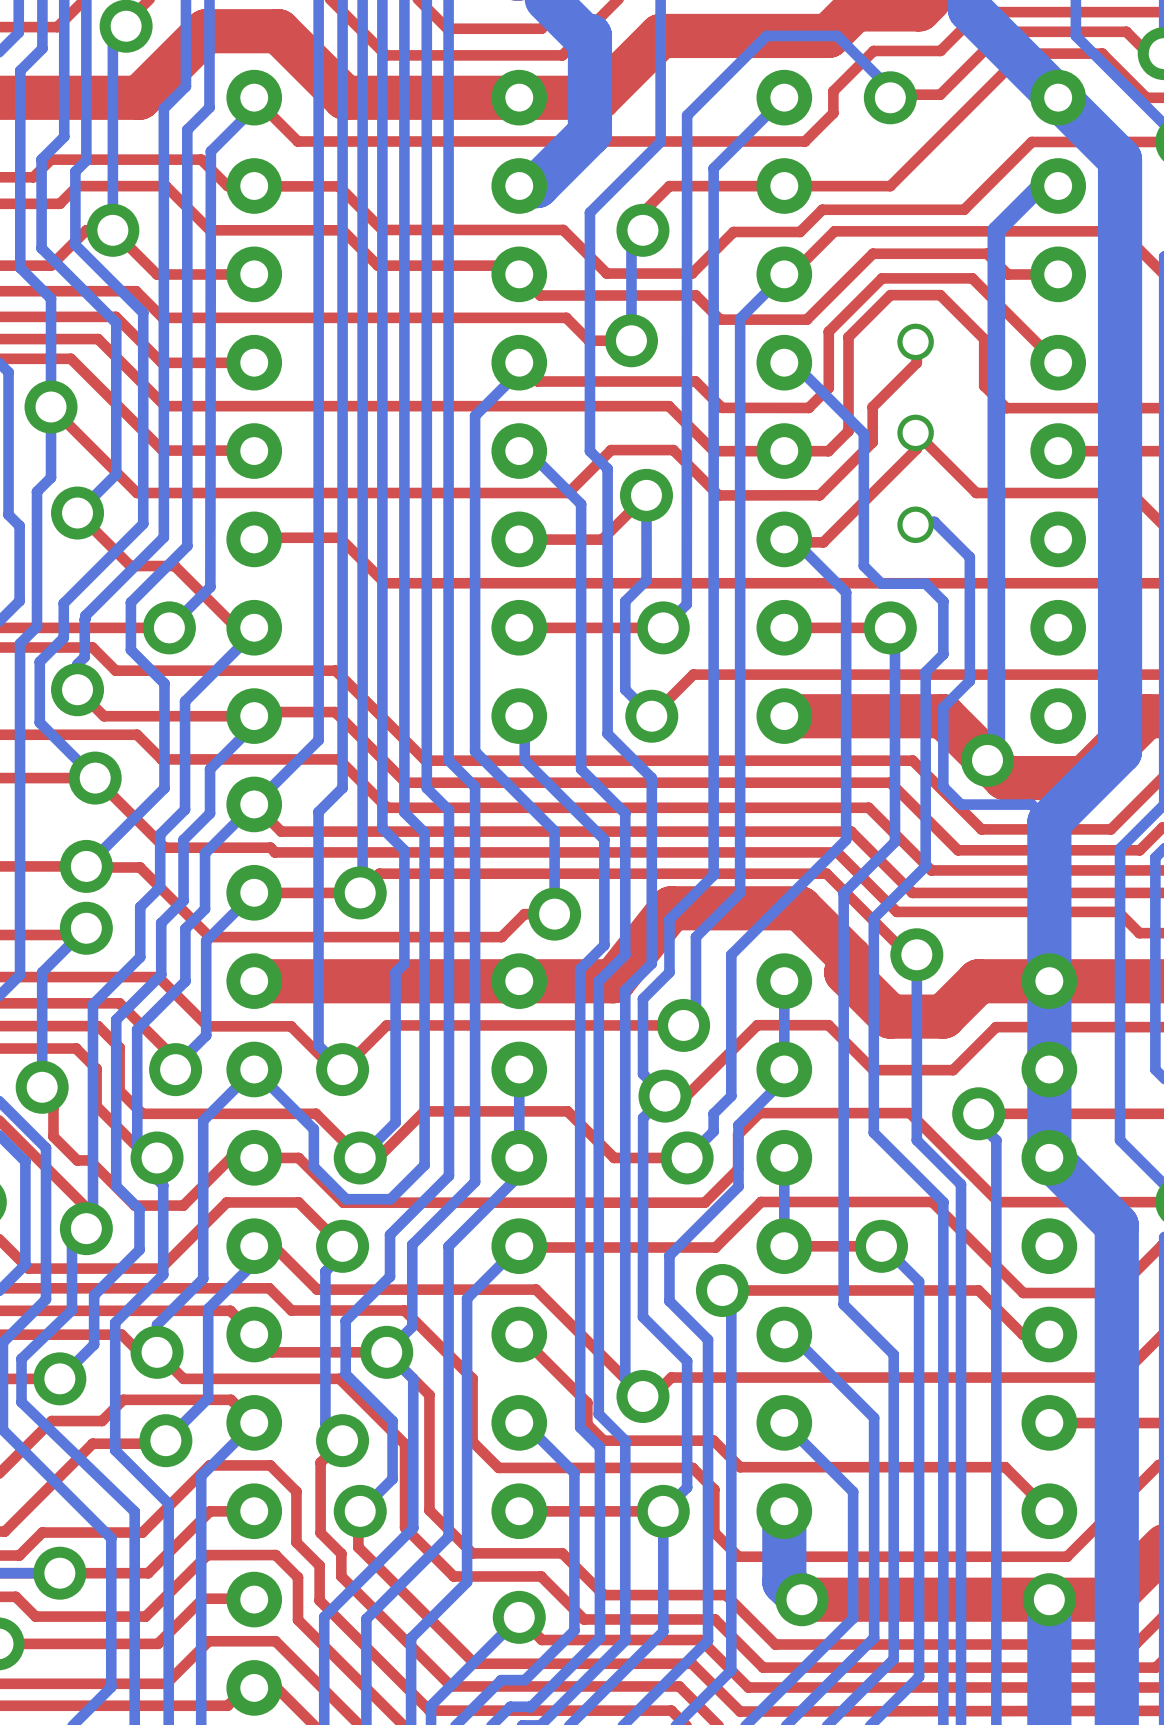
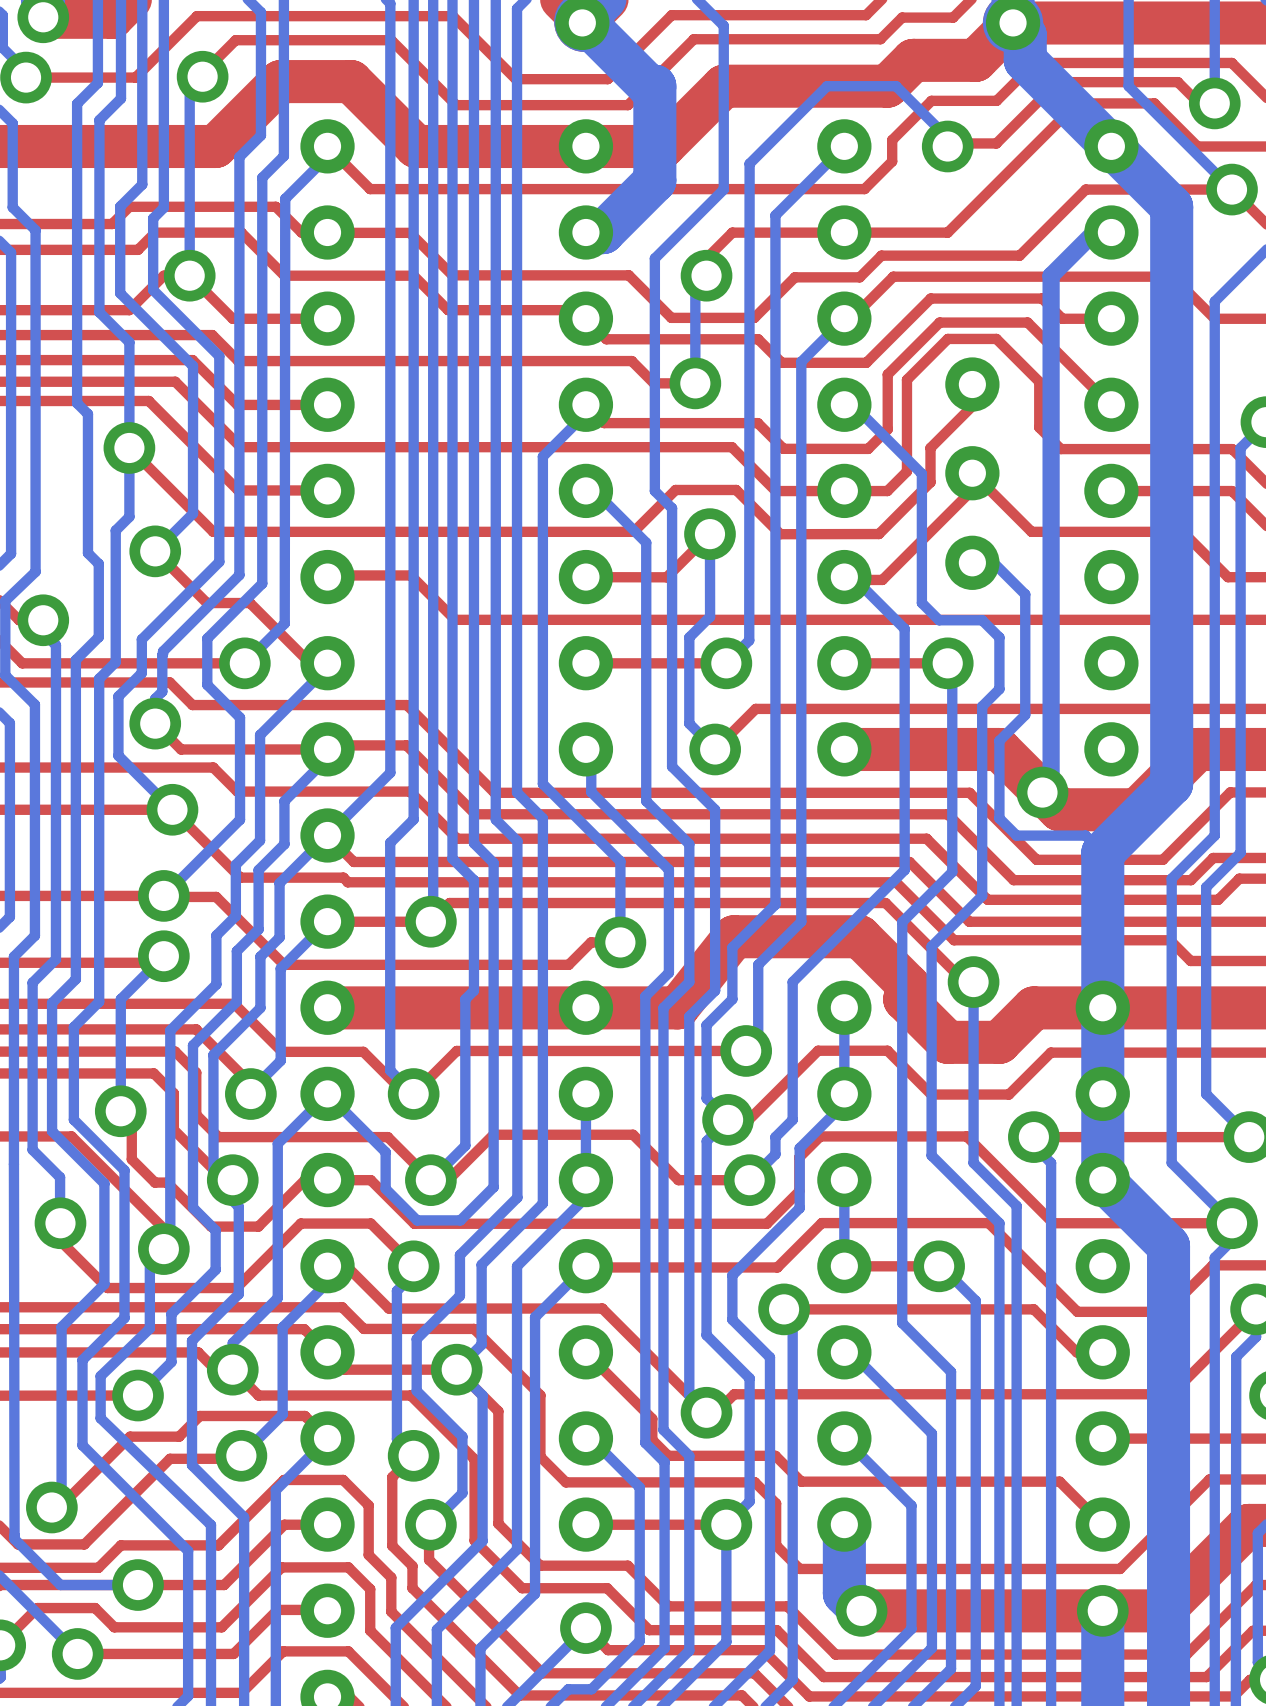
part footprint: [897, 323, 934, 544] -> [945, 357, 1000, 590]

